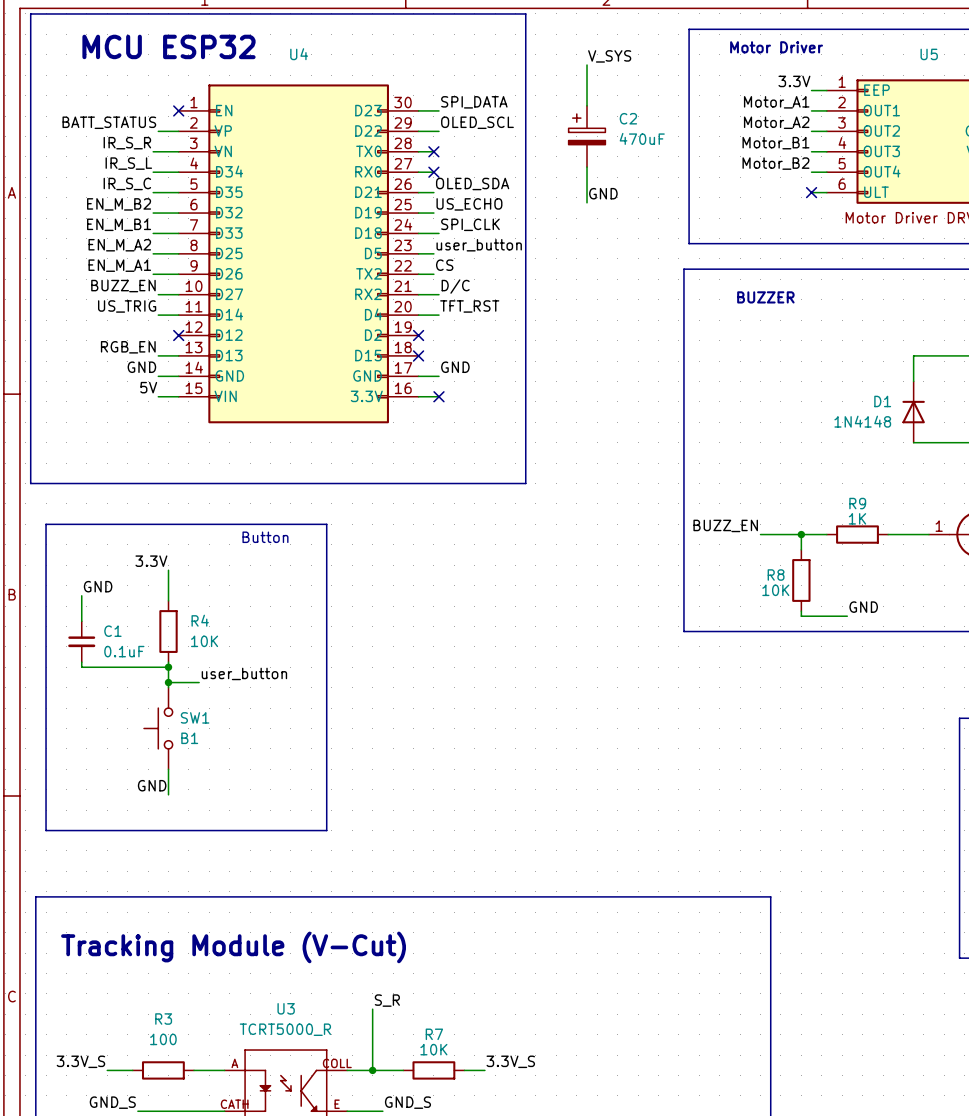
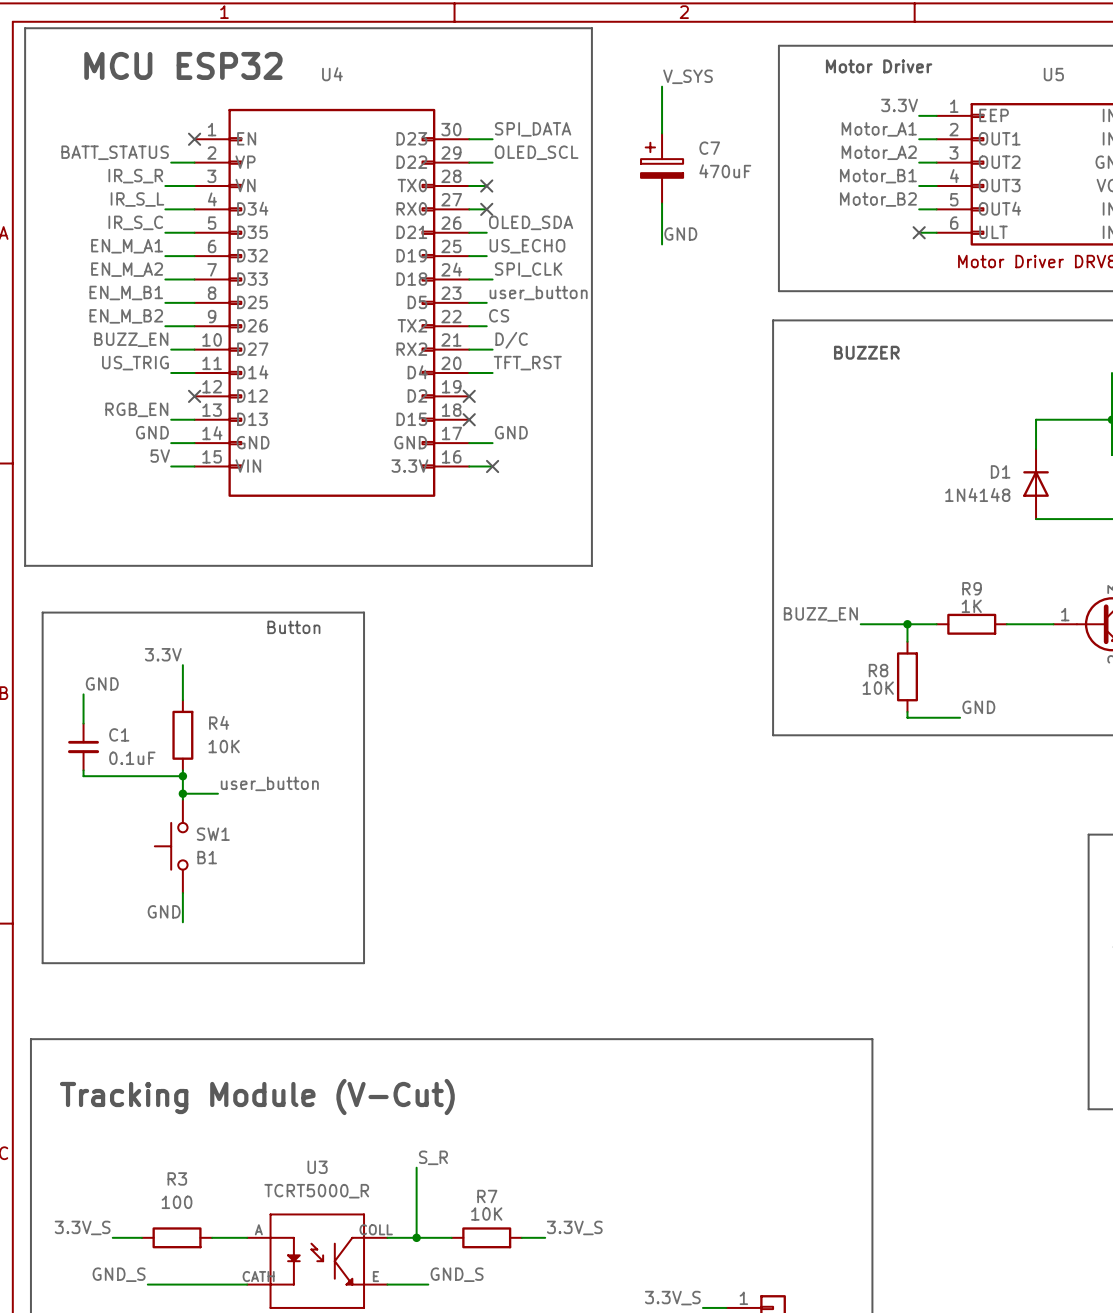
C2 name: C2 (628, 118) -> C7 (709, 148)
label: EN_M_B2 (119, 204) -> EN_M_A1 (127, 246)
label: EN_M_B1 (119, 224) -> EN_M_A2 (127, 269)
label: EN_M_A2 (119, 245) -> EN_M_B1 (126, 292)
label: EN_M_A1 (119, 265) -> EN_M_B2 (126, 316)

